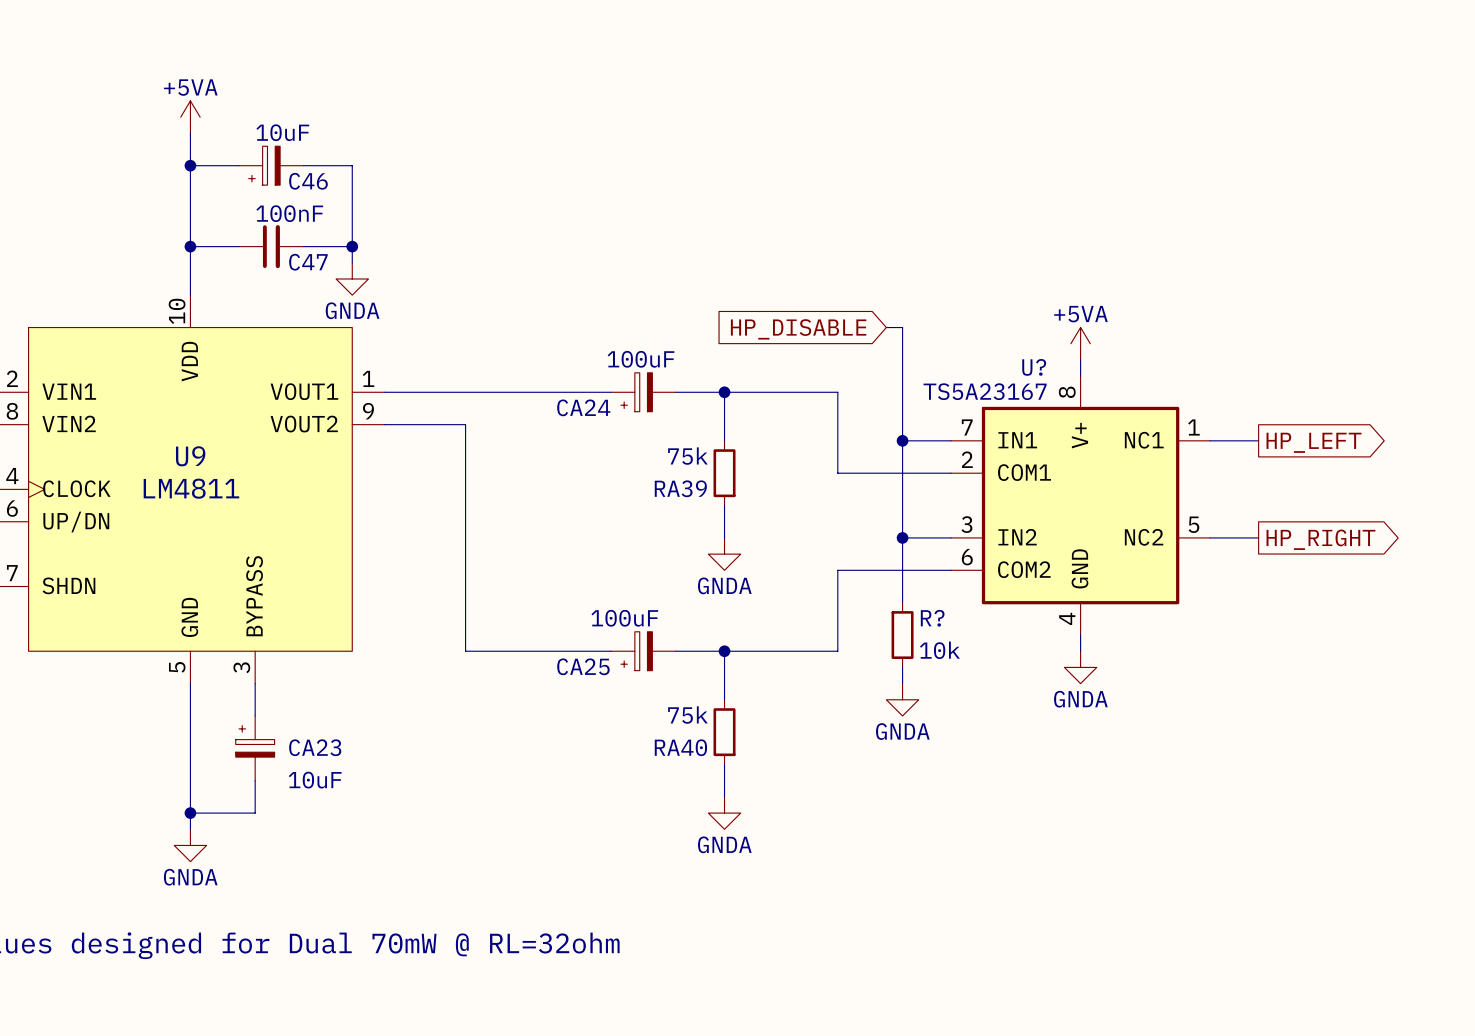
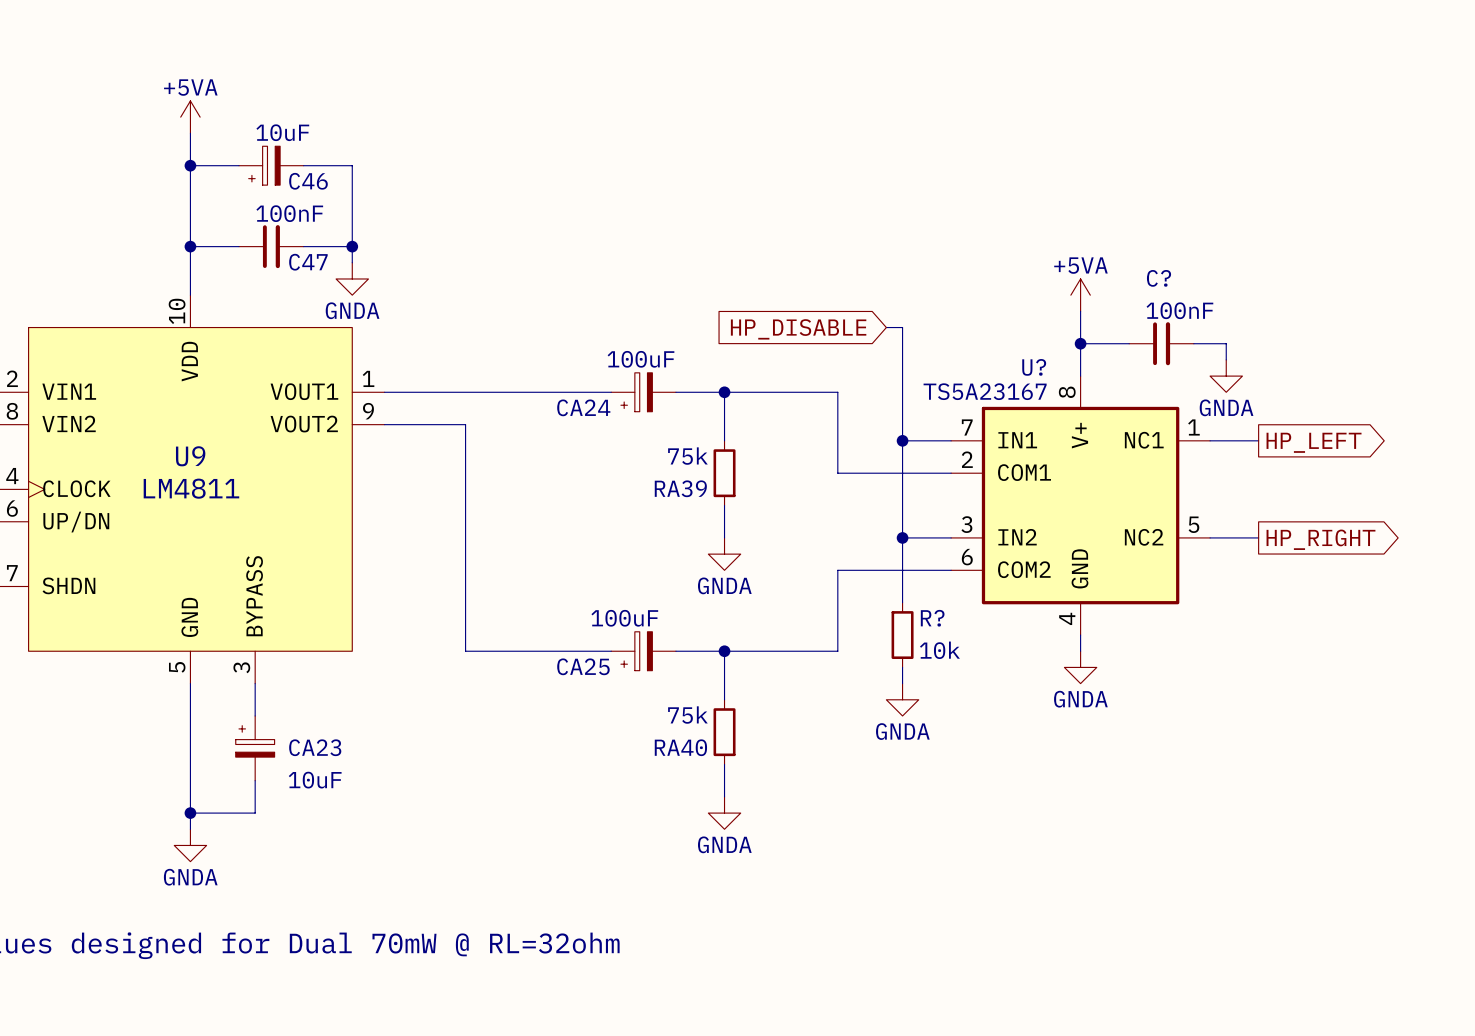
wire: none -> (1080, 343) (1129, 343)
power symbol position: +5VA (1080, 343) -> +5VA (1080, 295)
junction: none -> (1080, 343)
C?: none -> 100nF (1161, 343)
wire: none -> (1193, 343) (1226, 343) (1226, 359)
power symbol: none -> GNDA (1226, 376)

